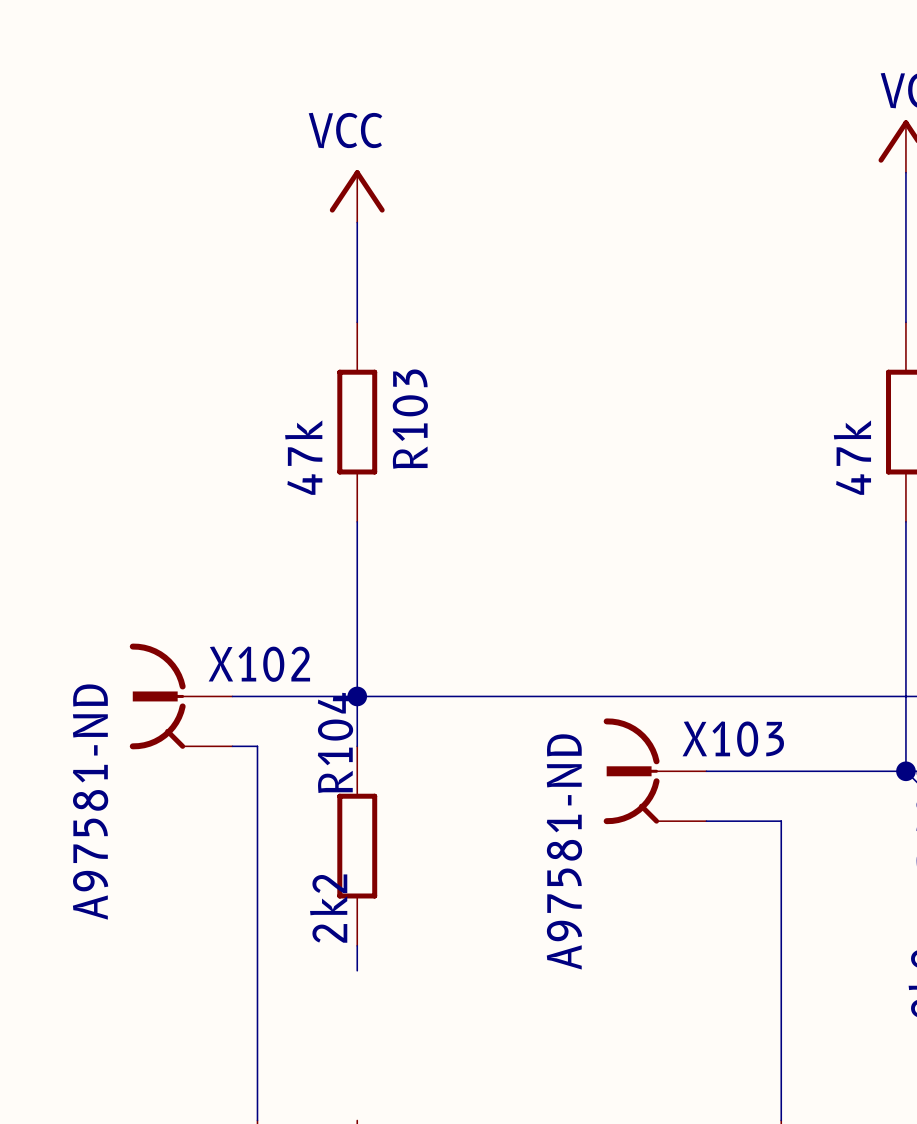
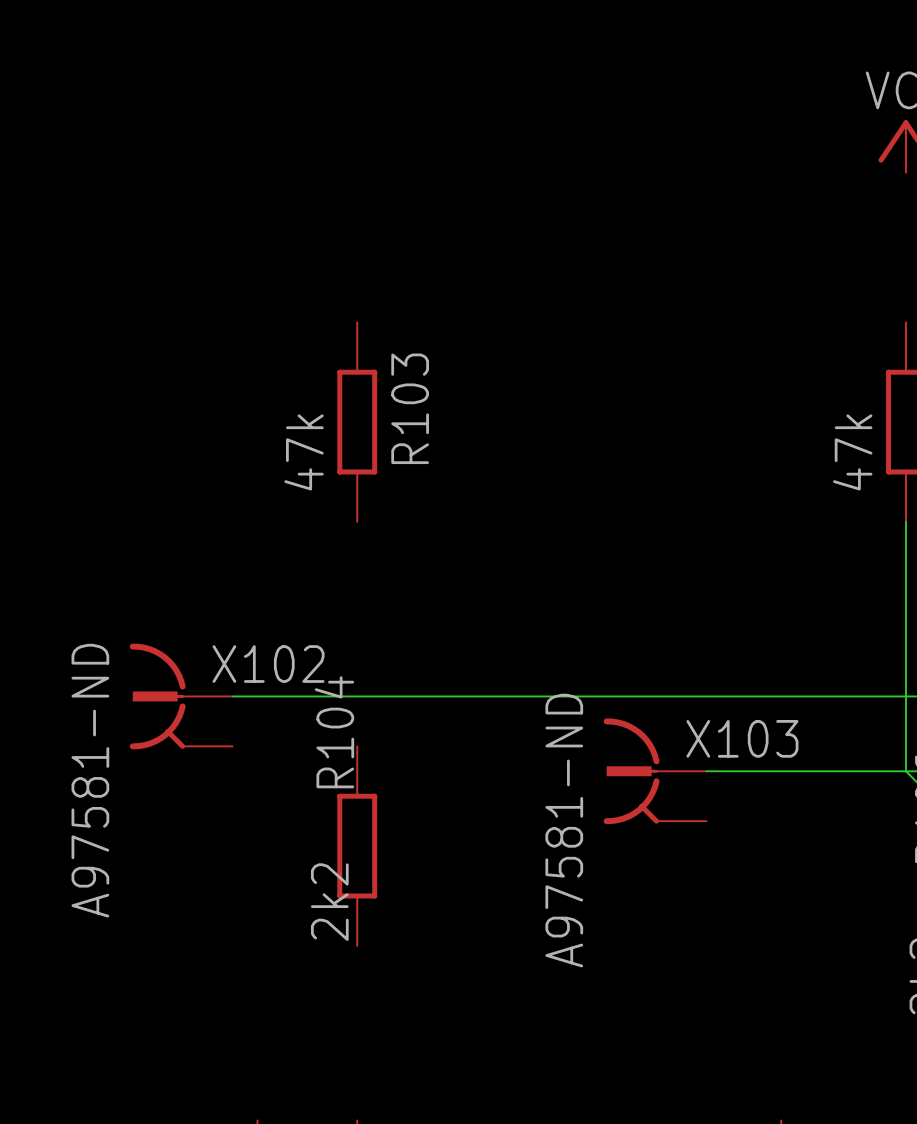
wire: (905, 172) (905, 322) -> none
power symbol: VCC (357, 196) -> none
wire: (357, 222) (357, 322) -> none
wire: (357, 521) (357, 746) -> none
junction: (357, 696) -> none
wire: (232, 746) (257, 746) (257, 1120) -> none
junction: (905, 771) -> none
wire: (706, 821) (781, 821) (781, 1120) -> none
wire: (357, 945) (357, 970) -> none

